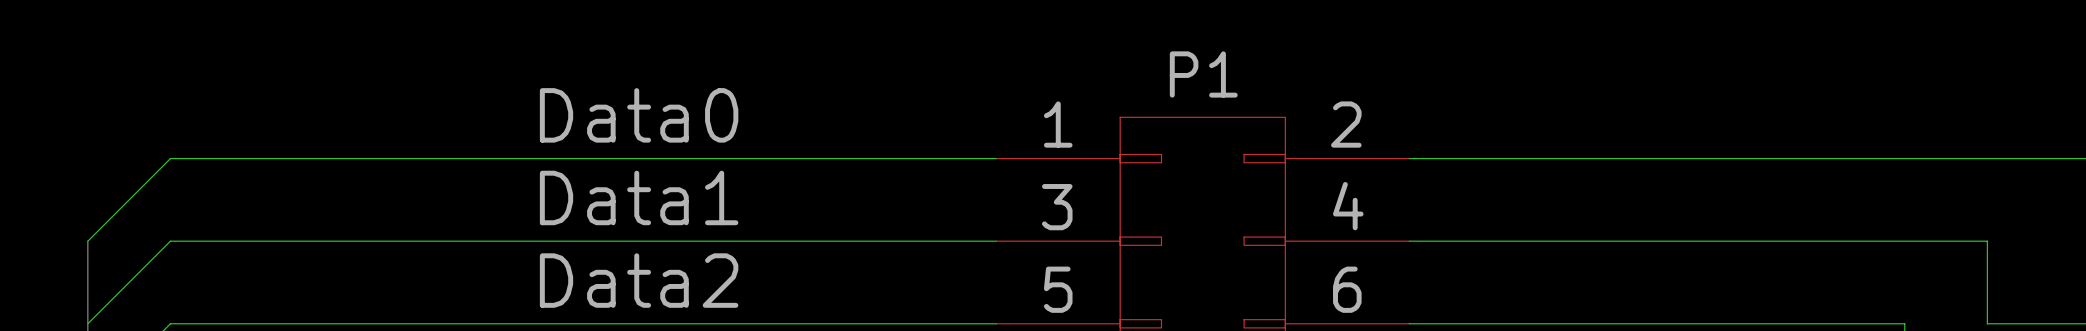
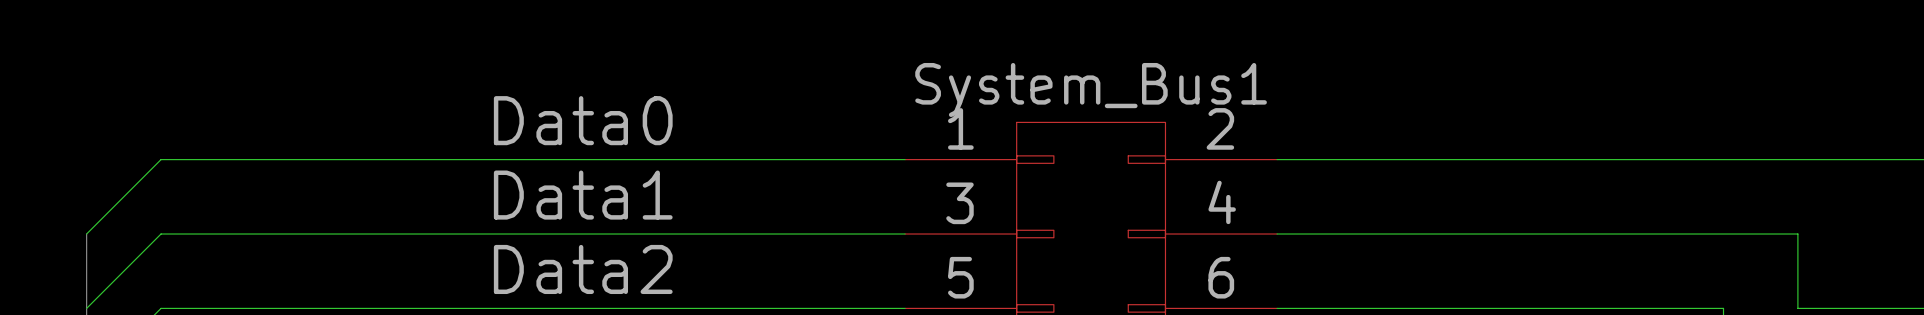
P1 name: P1 (1203, 74) -> System_Bus1 (1091, 90)

